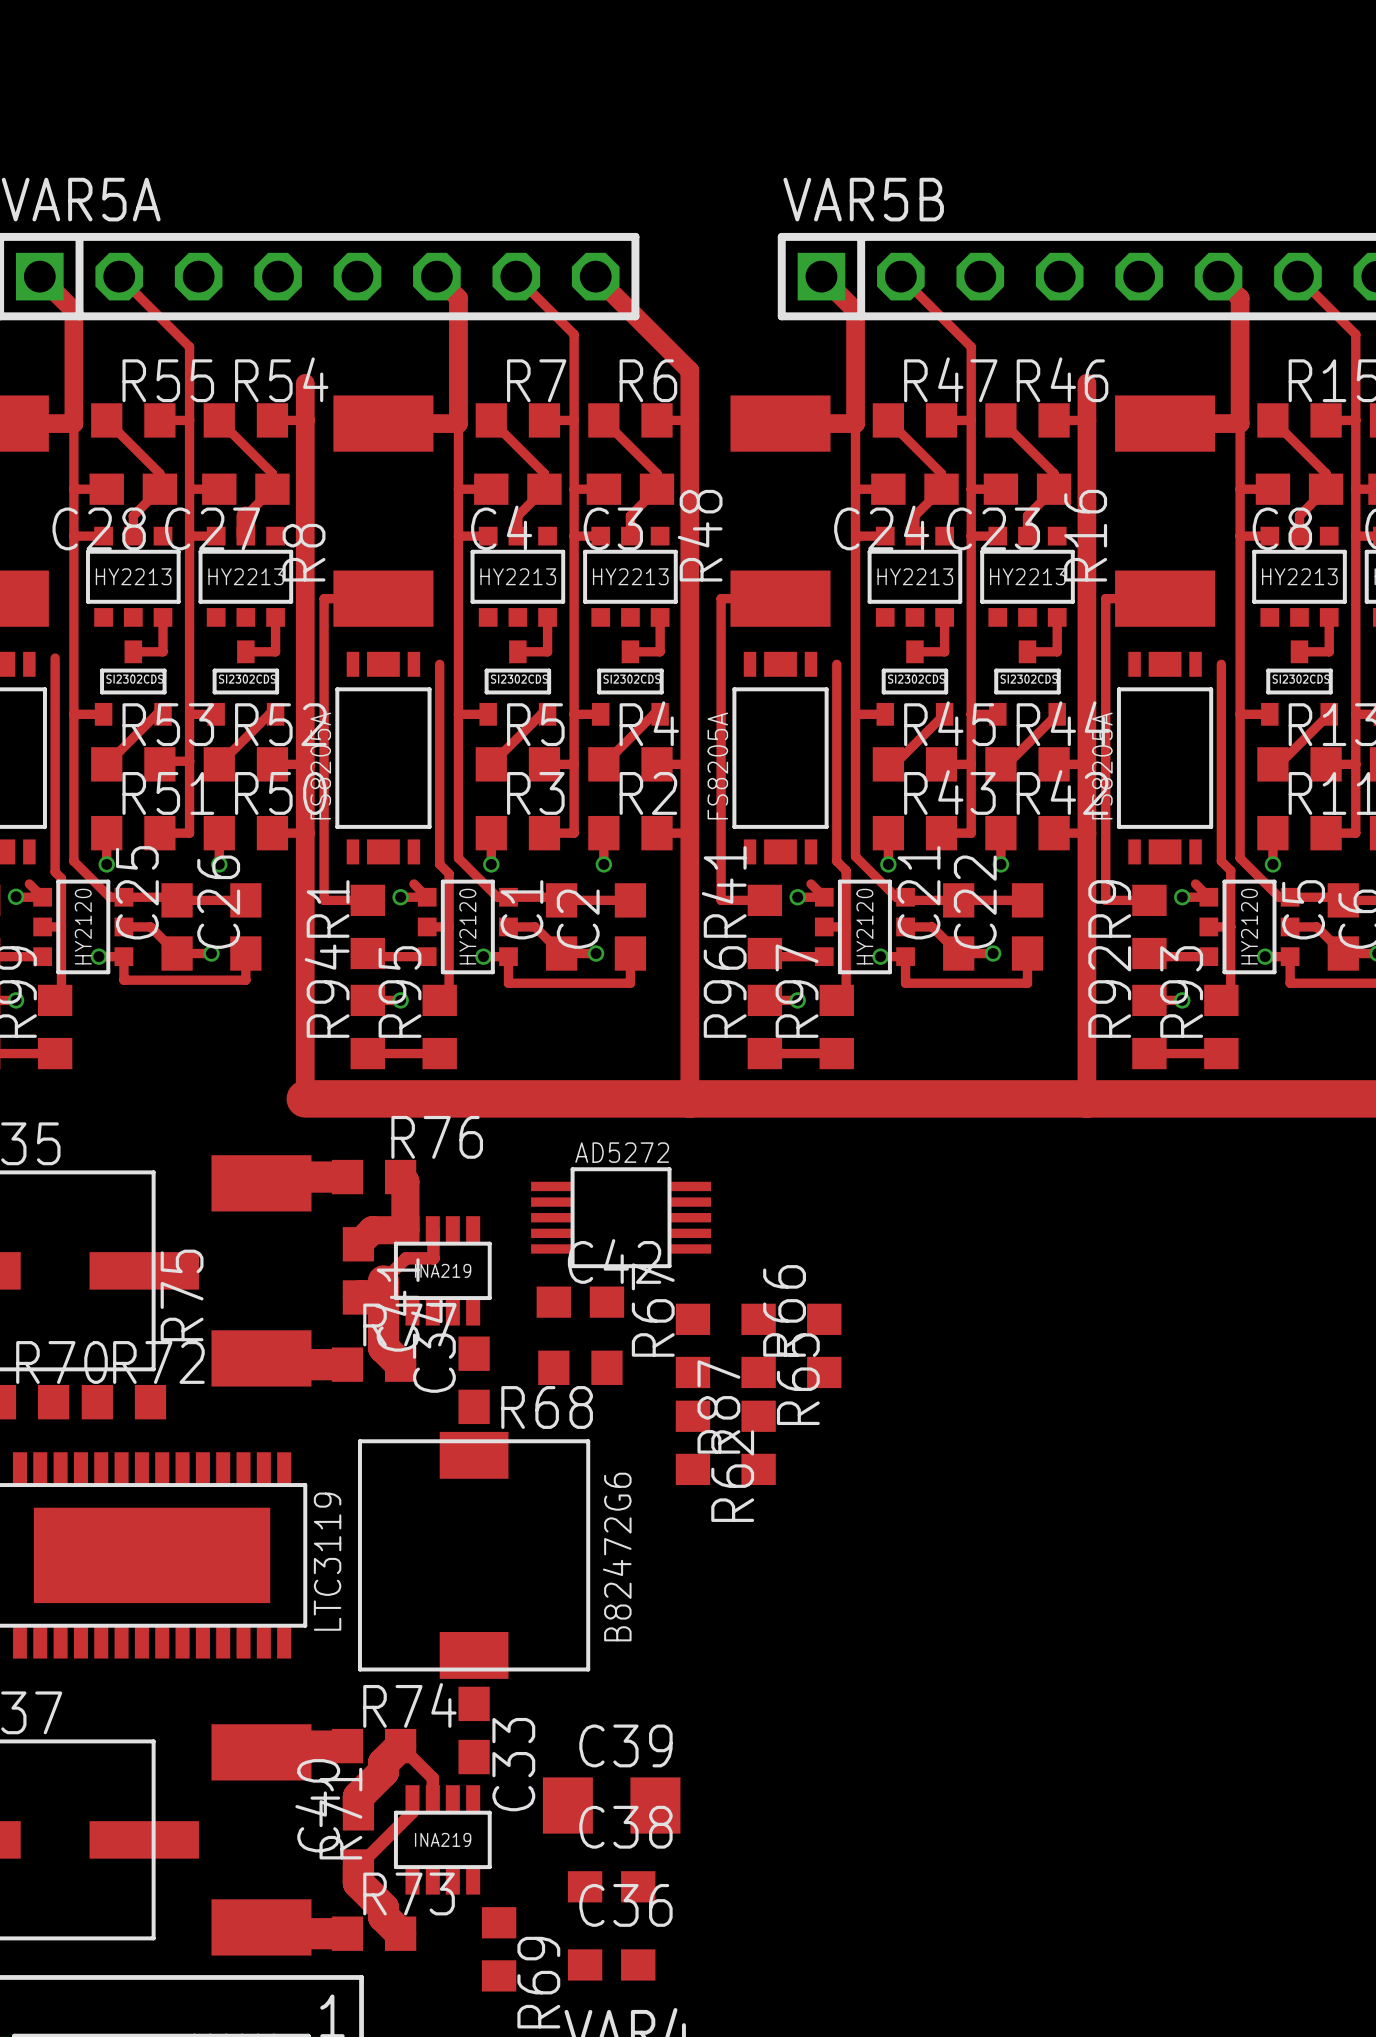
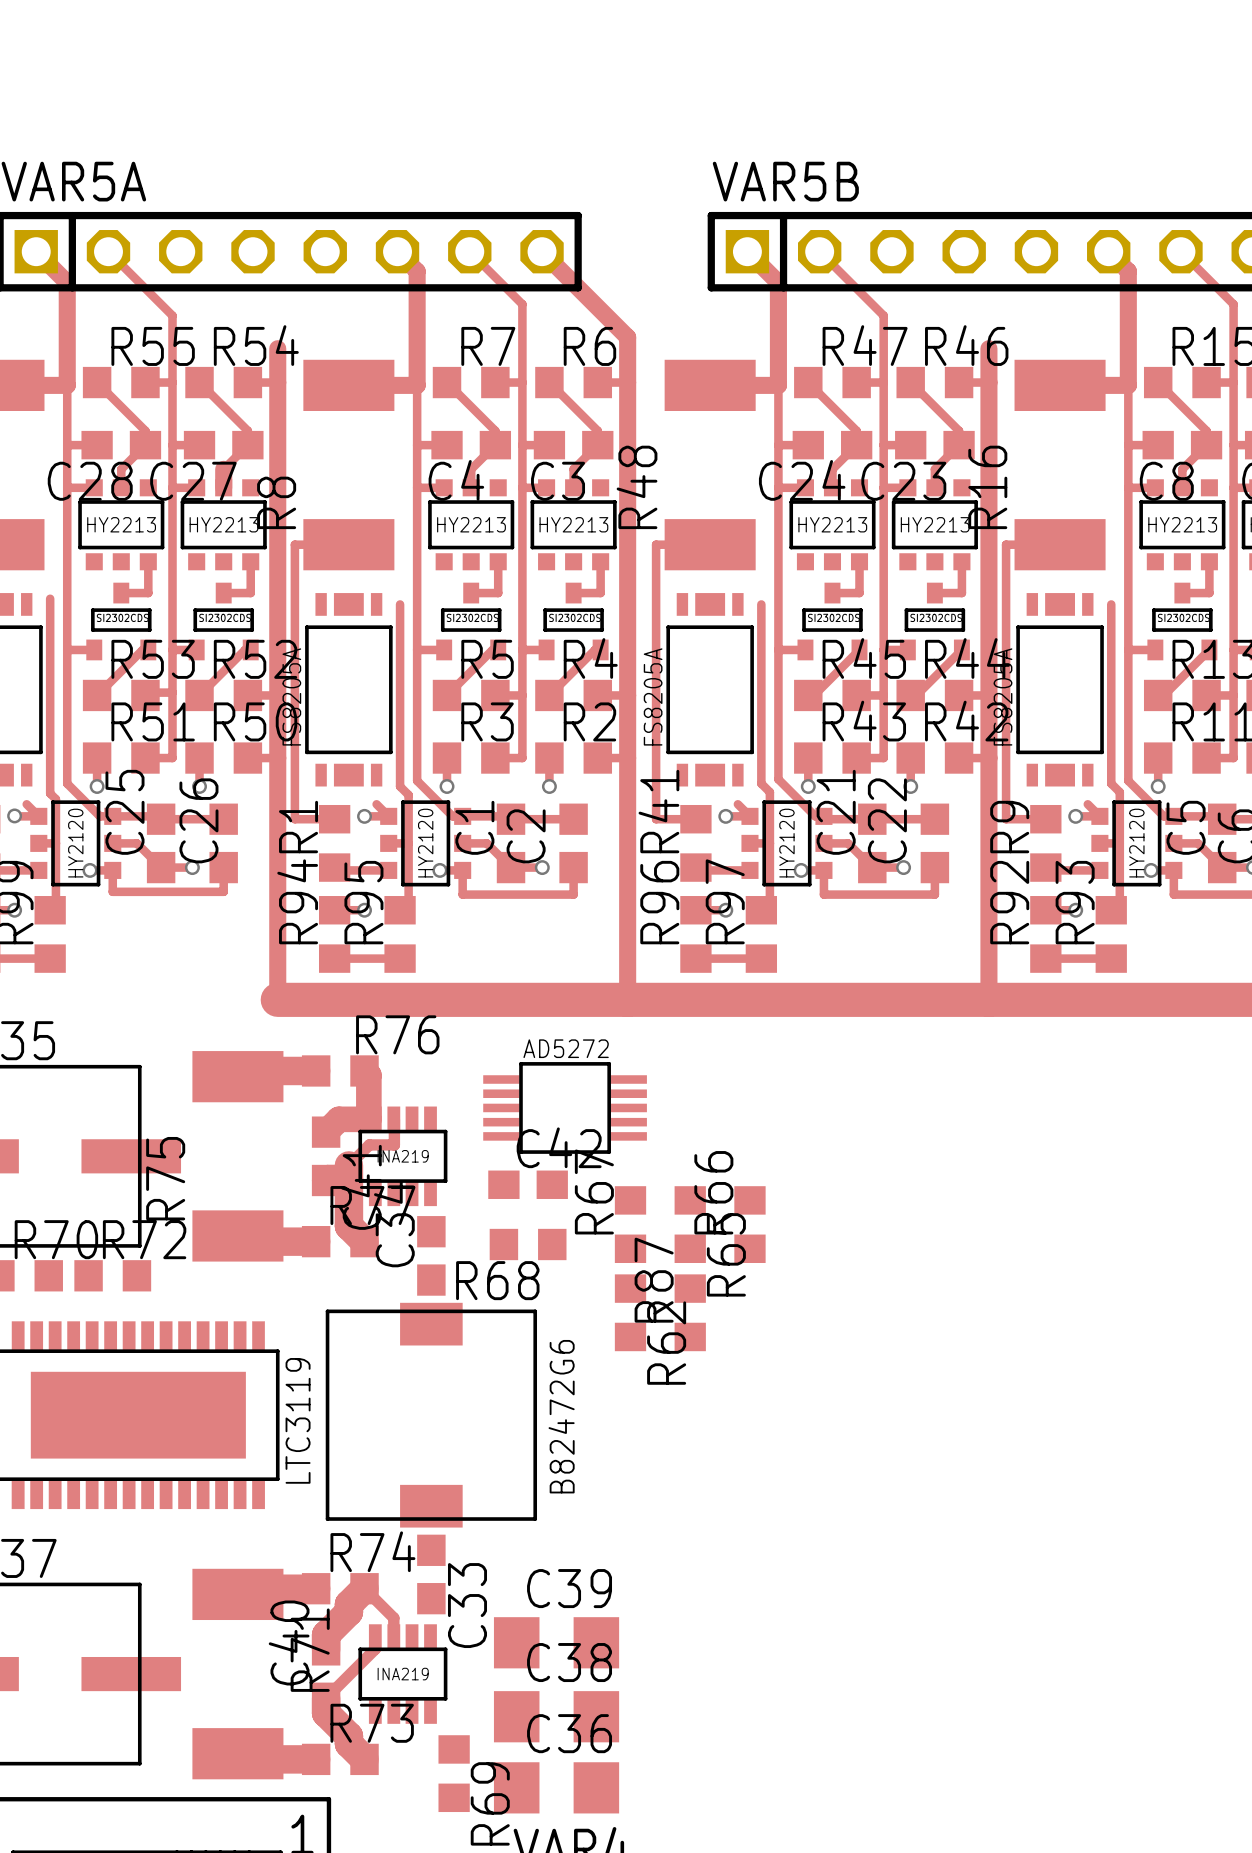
C38 footprint: [567, 1871, 656, 1903] -> [493, 1691, 620, 1743]
C36 footprint: [567, 1949, 656, 1981] -> [493, 1762, 620, 1814]

